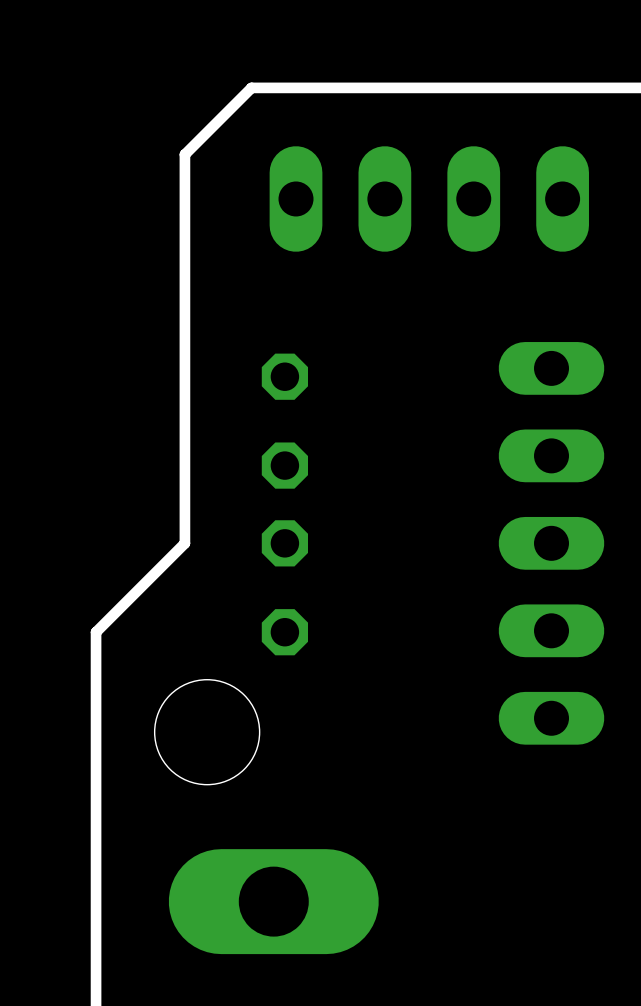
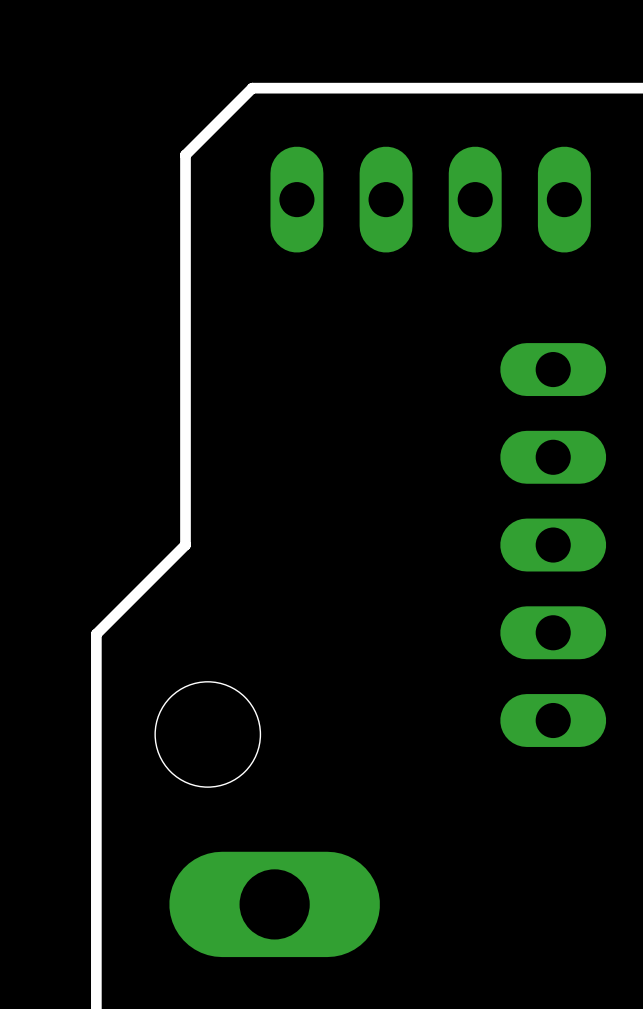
part: (284, 421) -> none
part: (284, 587) -> none

